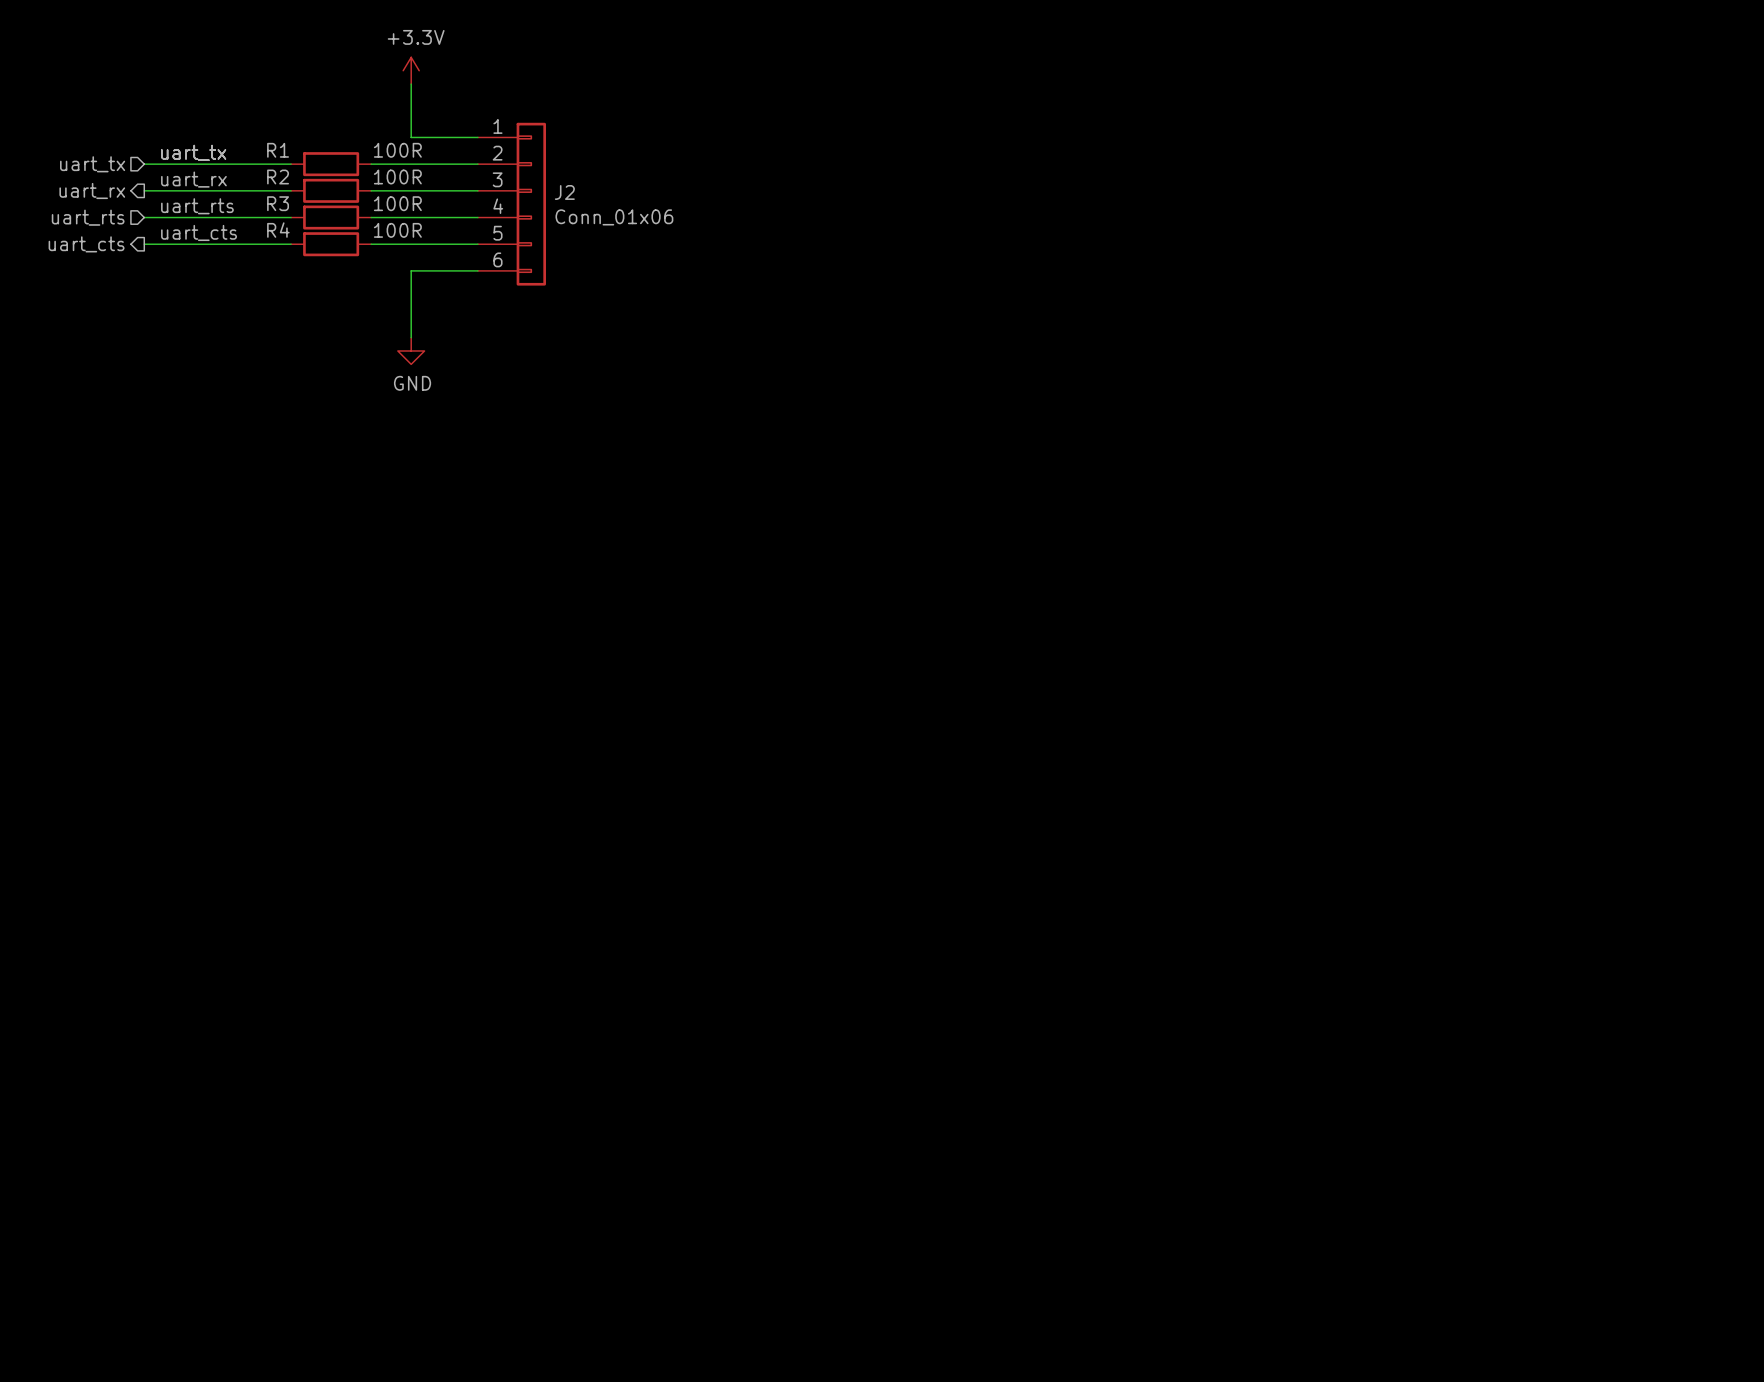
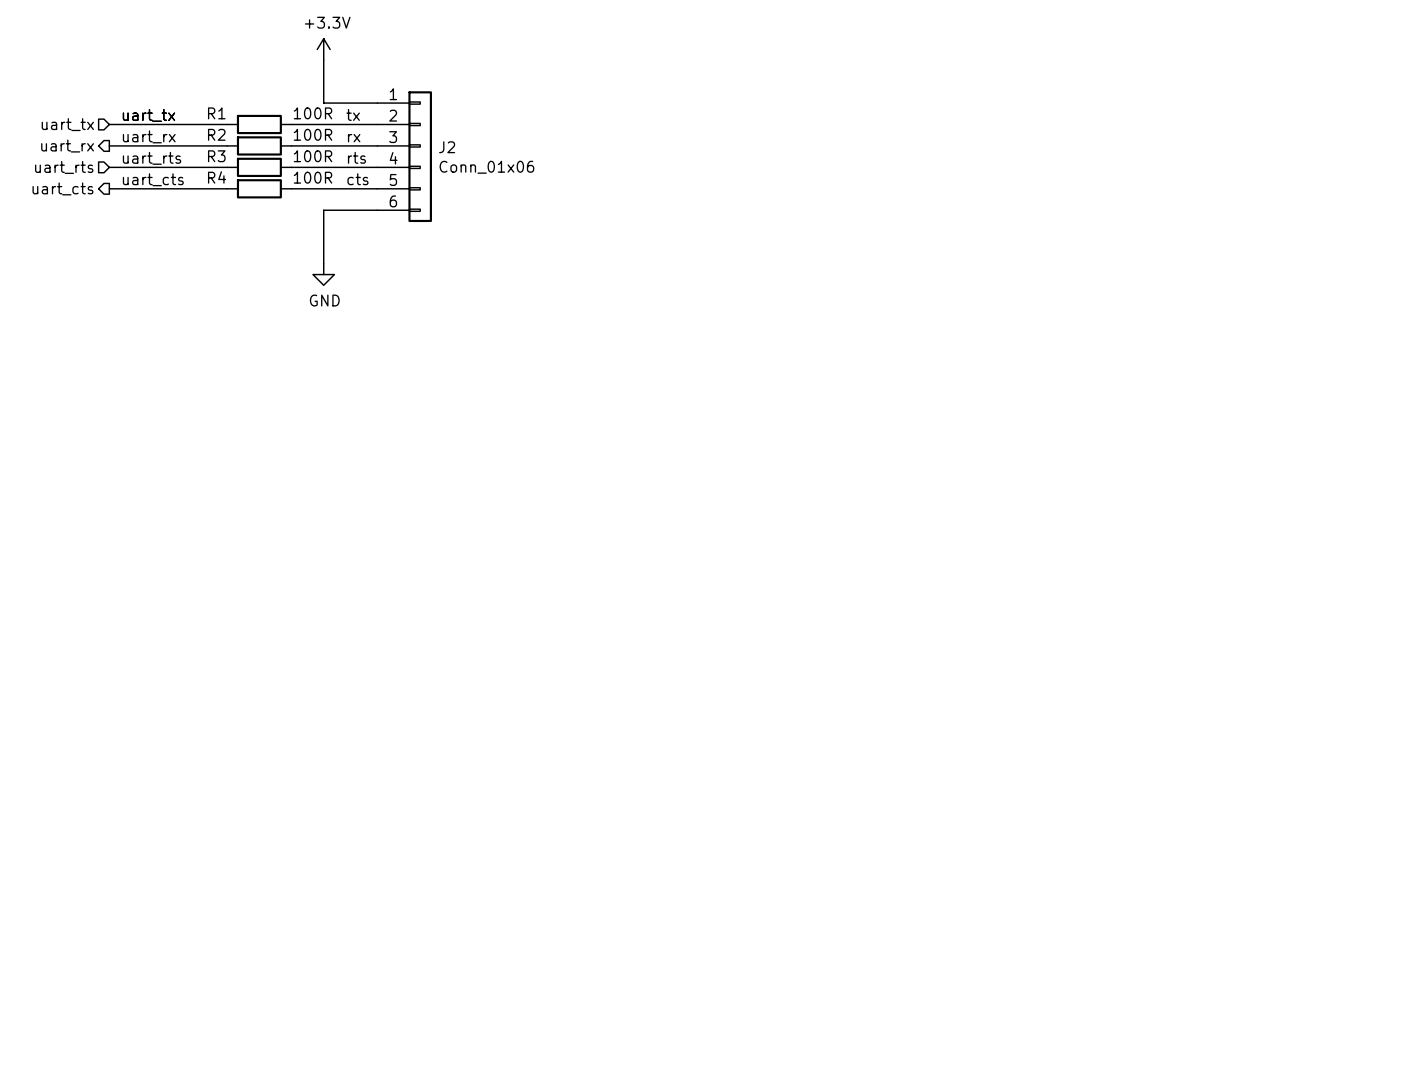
label: none -> tx (353, 114)
label: none -> rx (354, 138)
label: none -> rts (356, 157)
label: none -> cts (357, 179)

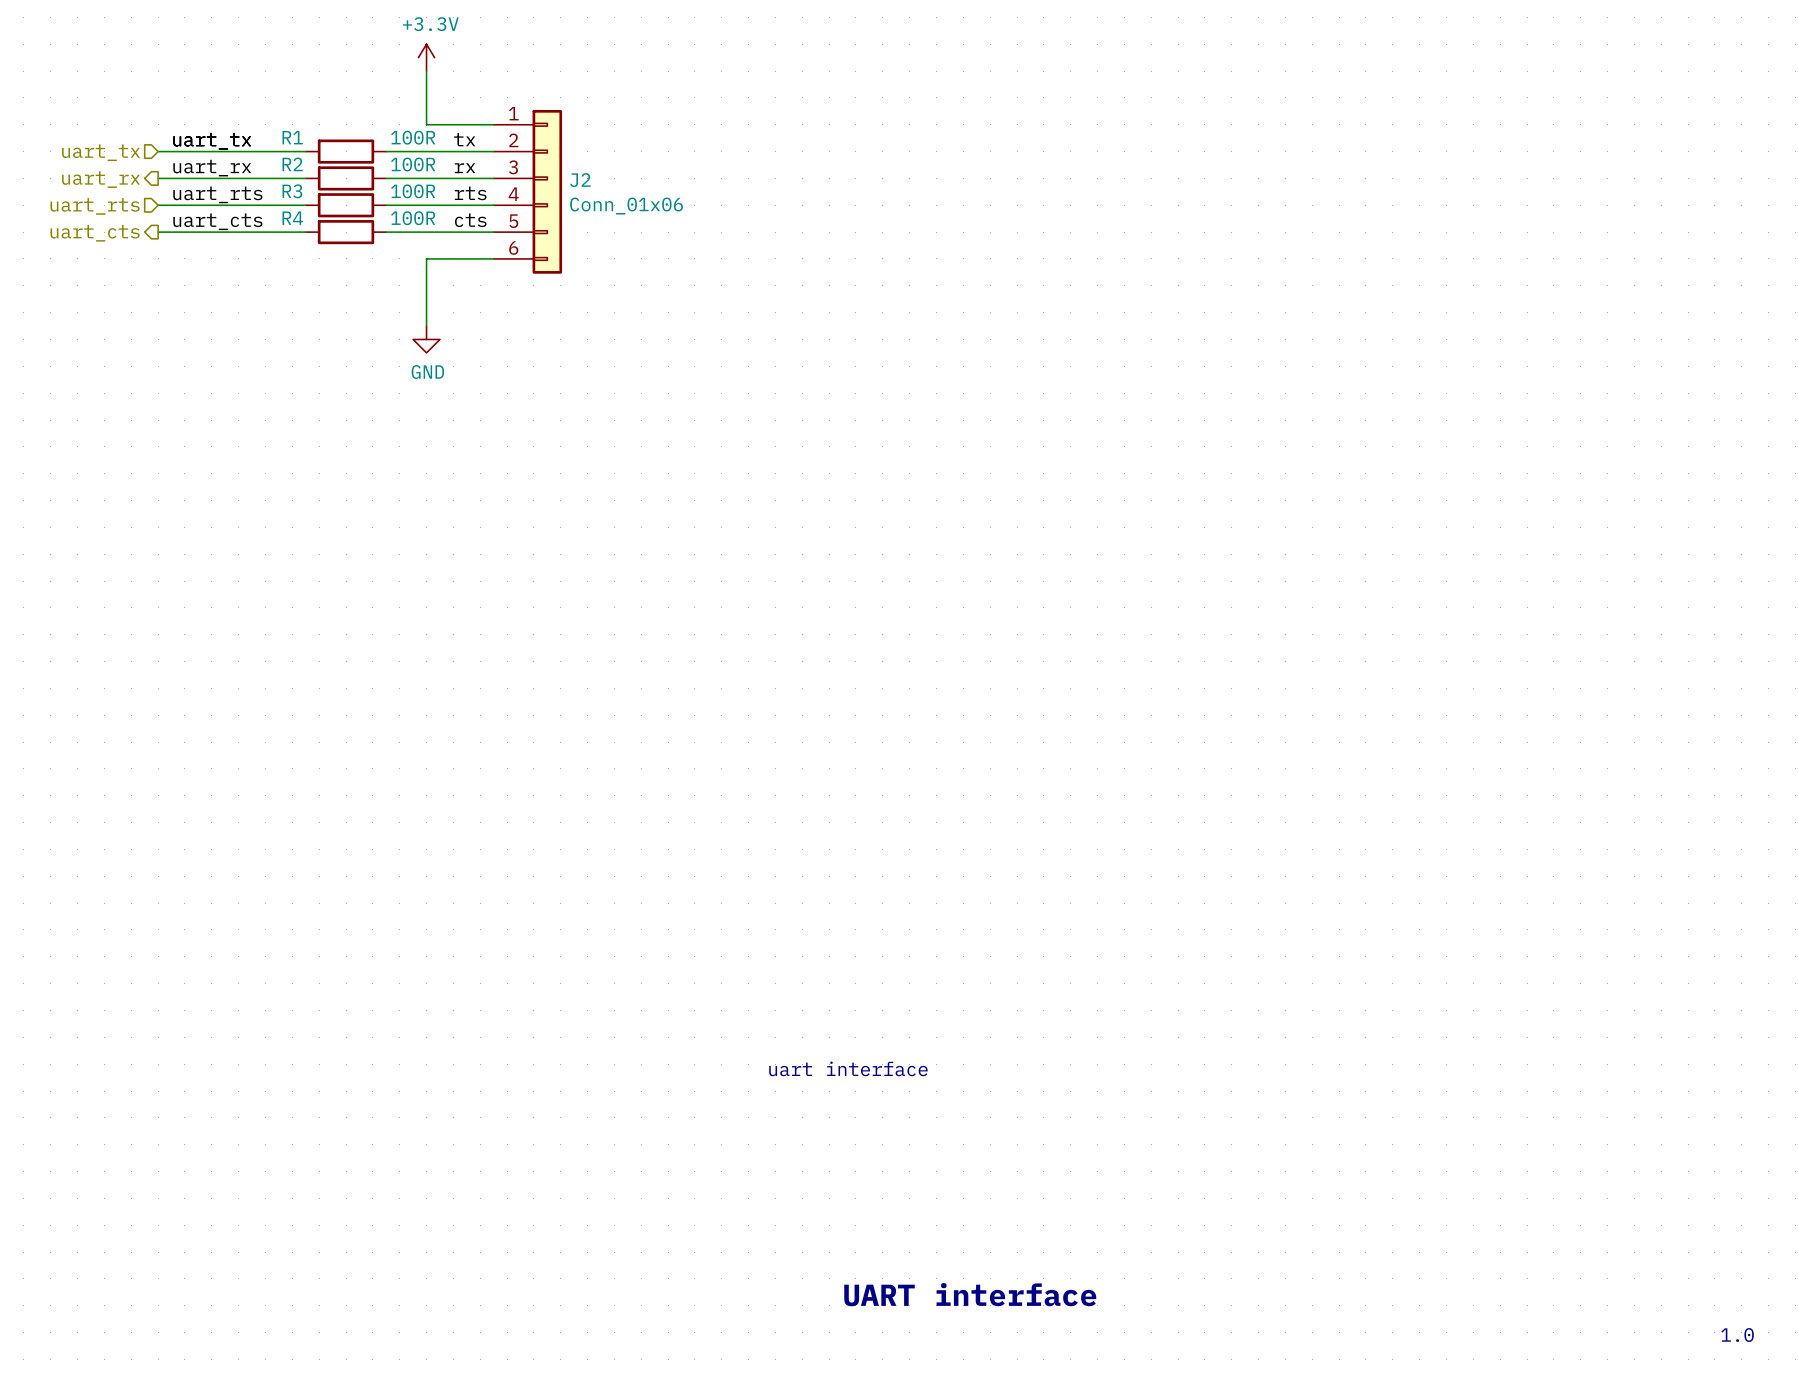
text: none -> uart interface (848, 1068)
text: none -> UART interface (970, 1294)
text: none -> 1.0 (1737, 1335)

